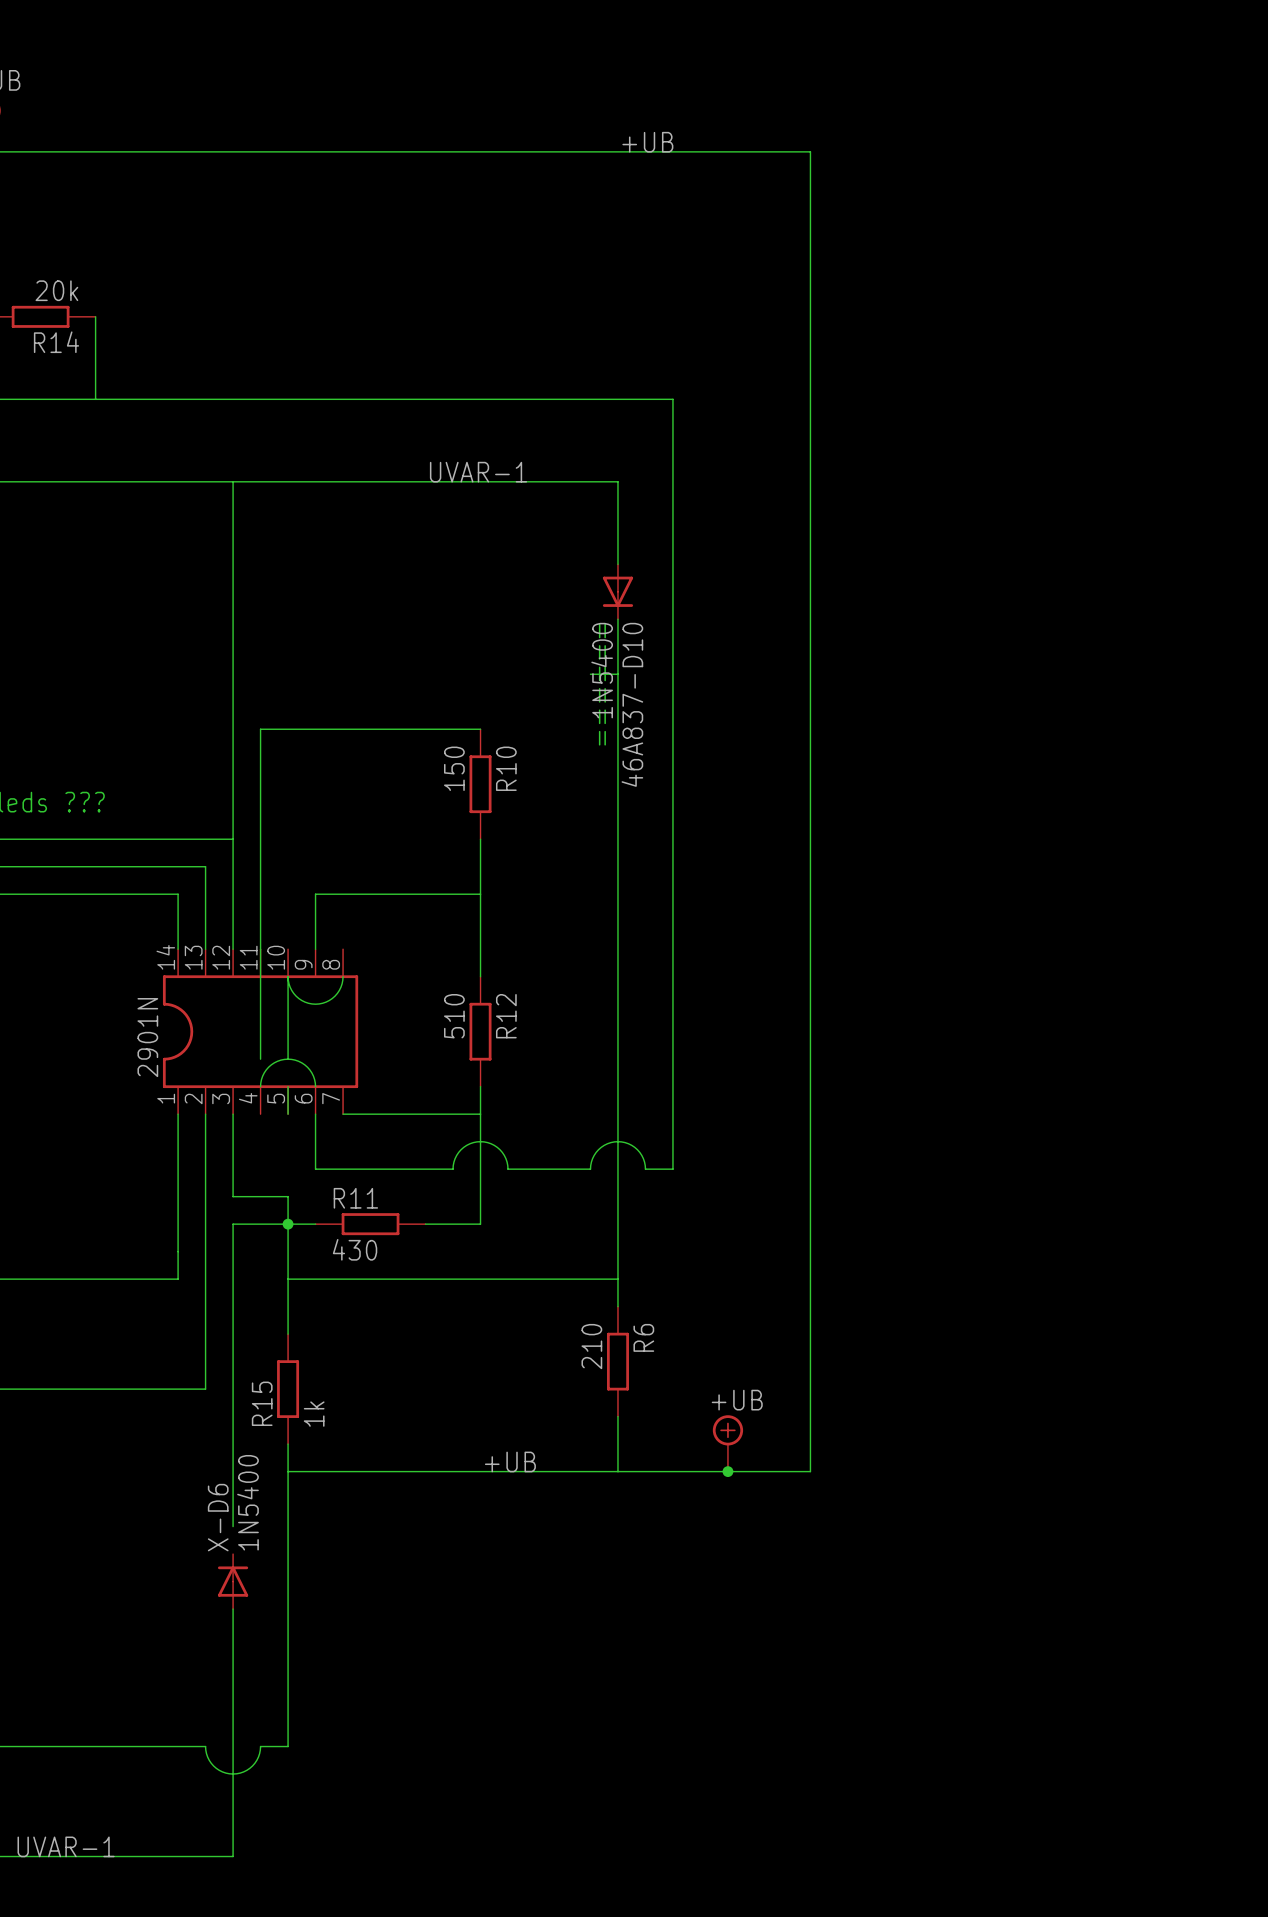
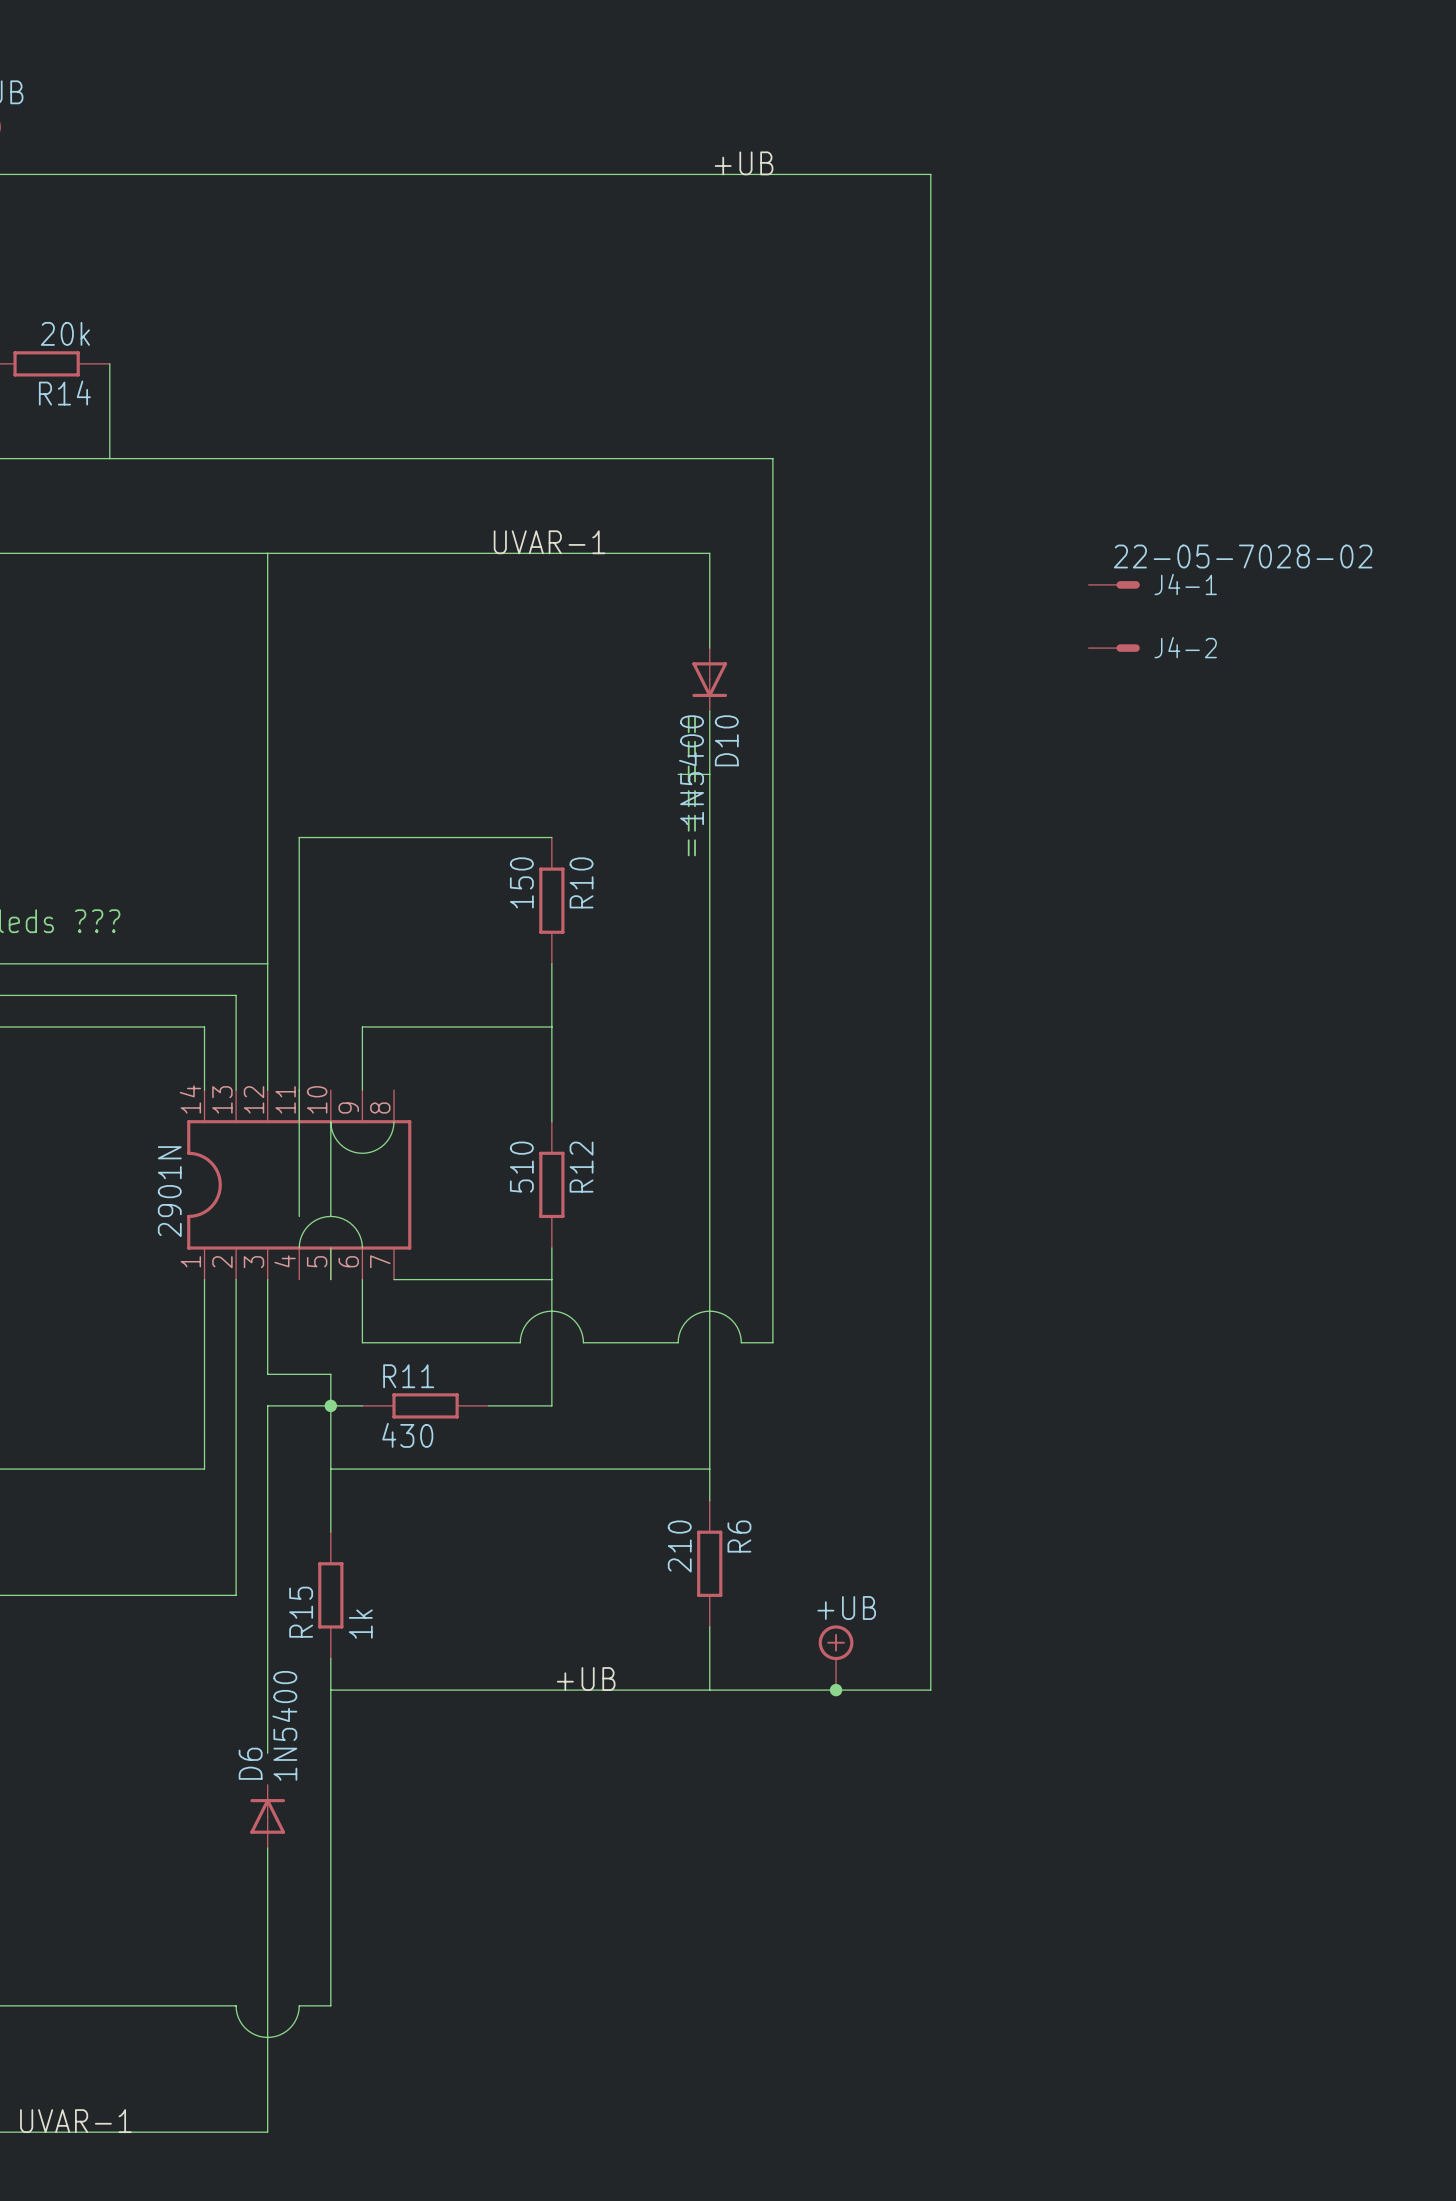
J4-1: none -> 22-05-7028-02 (1114, 584)
J4-2: none -> (1114, 648)
46A837-D10 name: 46A837-D10 (632, 704) -> D10 (726, 740)
X-D6 name: X-D6 (218, 1517) -> D6 (250, 1763)

